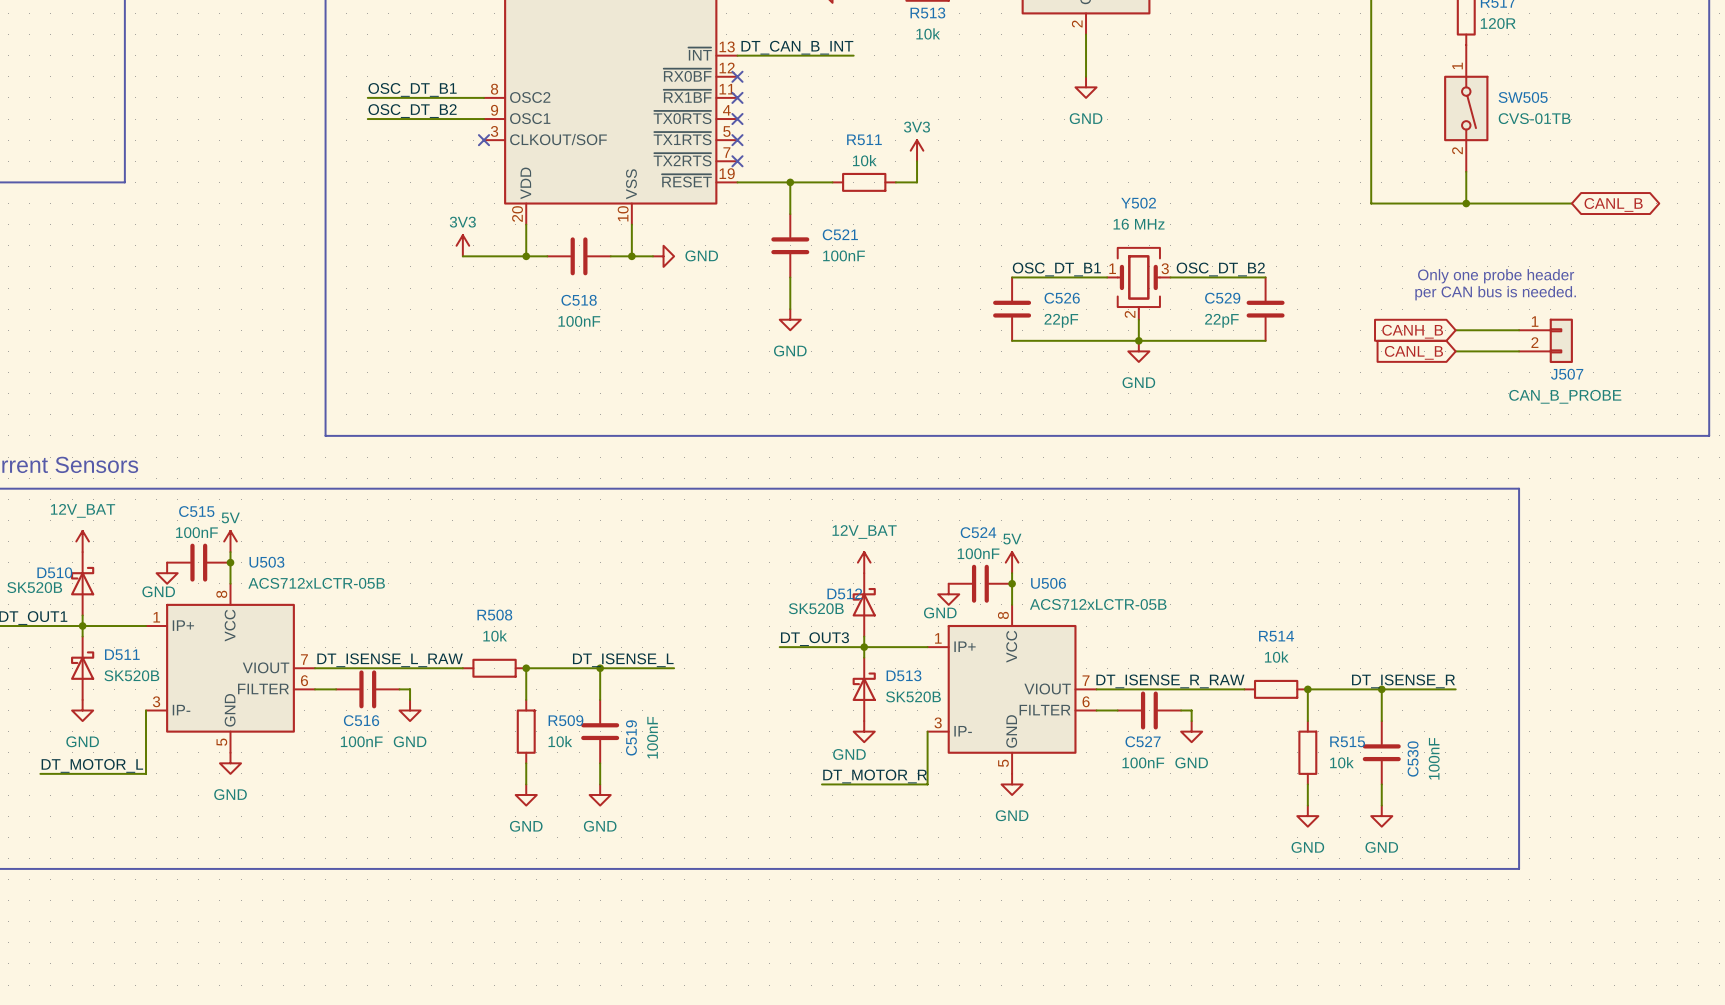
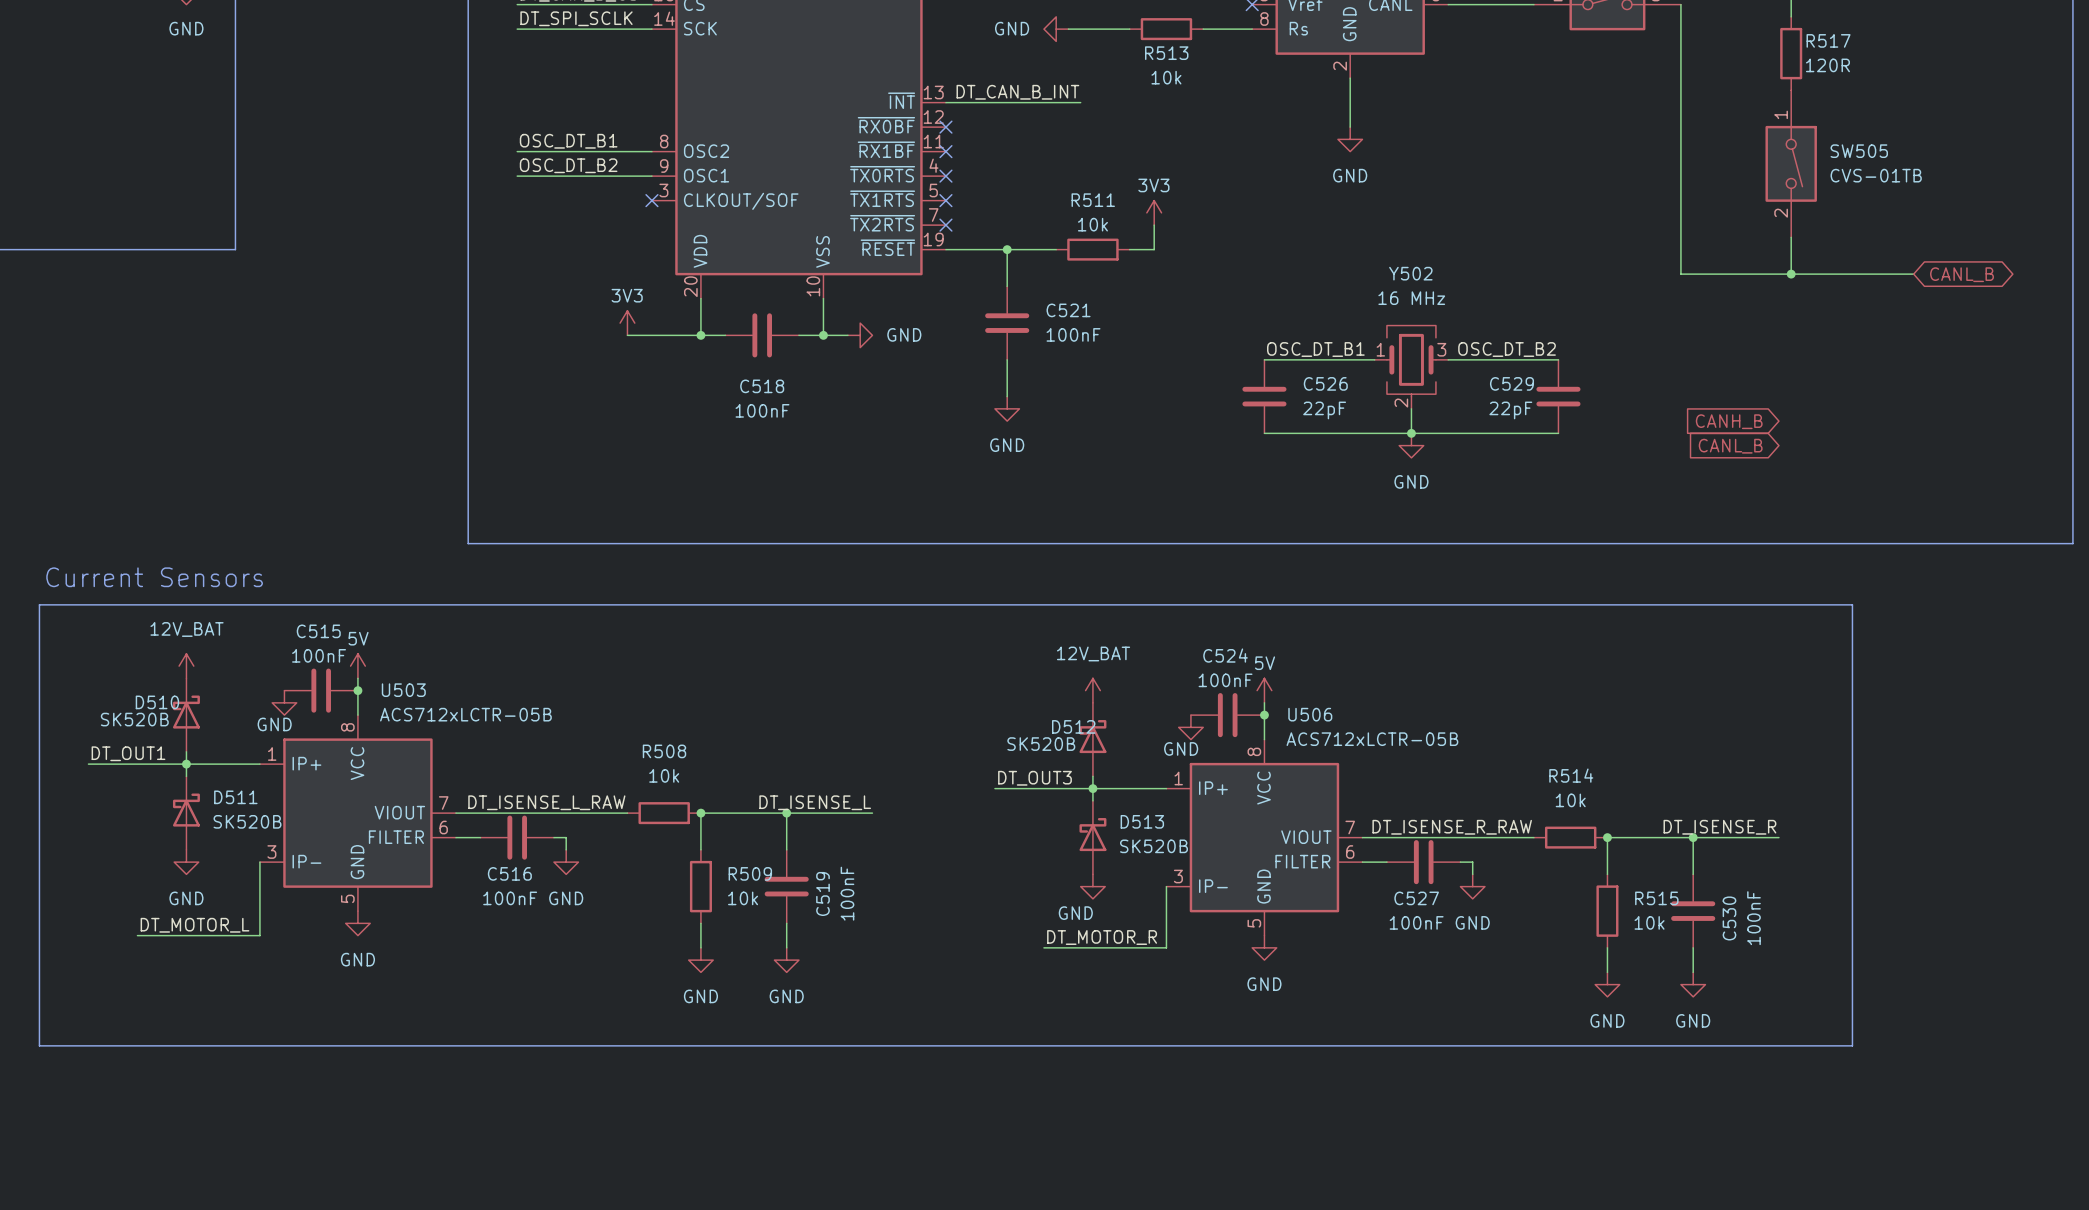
text: Only one probe header (1496, 276) -> none
text: per CAN bus is needed. (1495, 293) -> none
wire: (1455, 330) (1519, 330) -> none
J507: CAN_B_PROBE (1546, 340) -> none
wire: (1455, 351) (1519, 351) -> none

